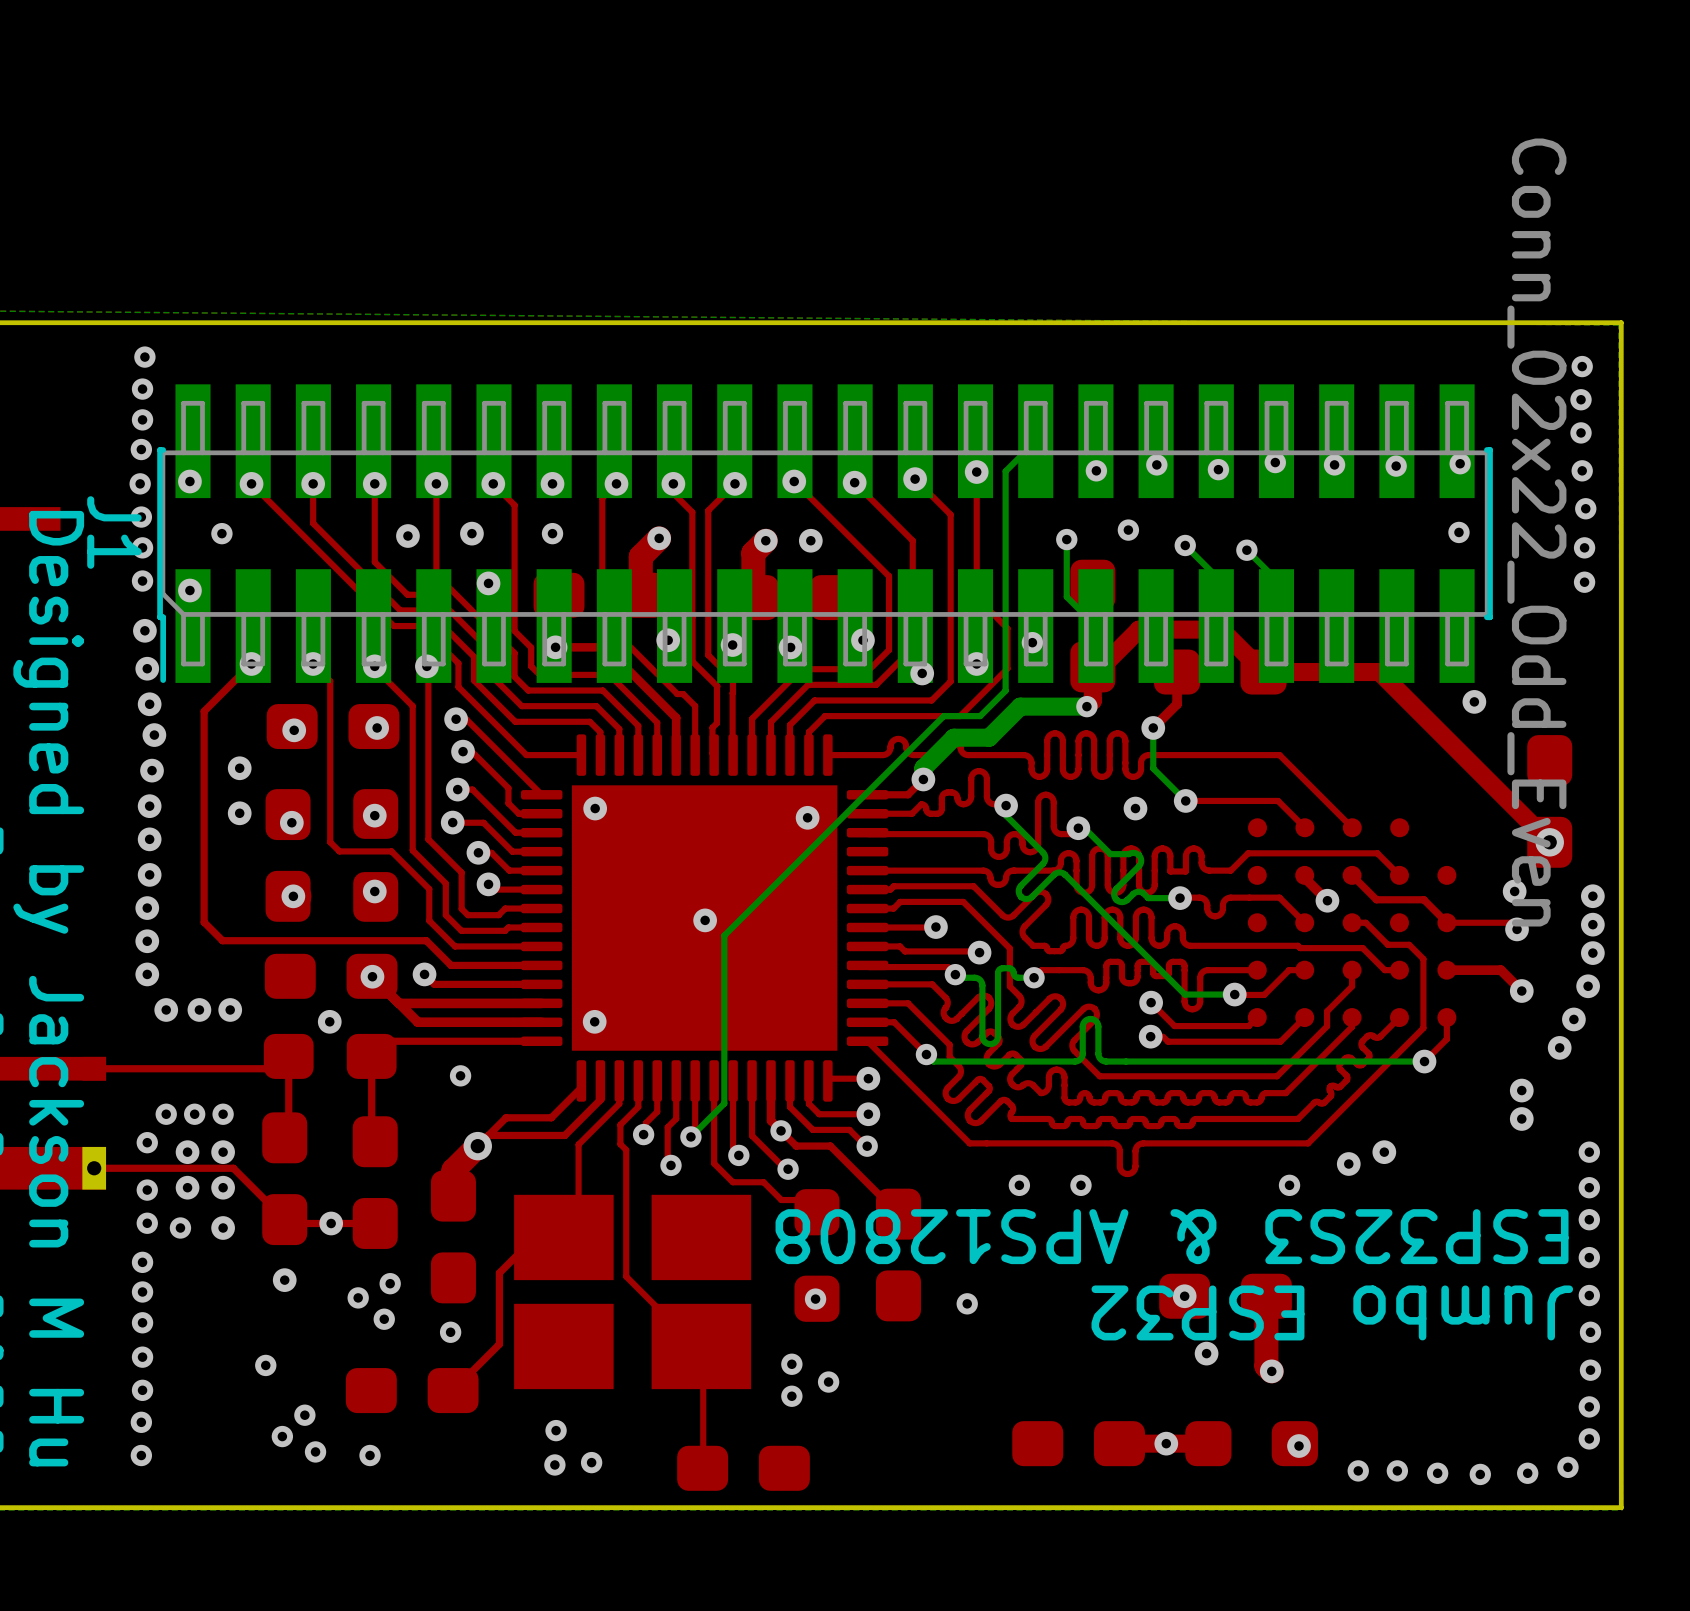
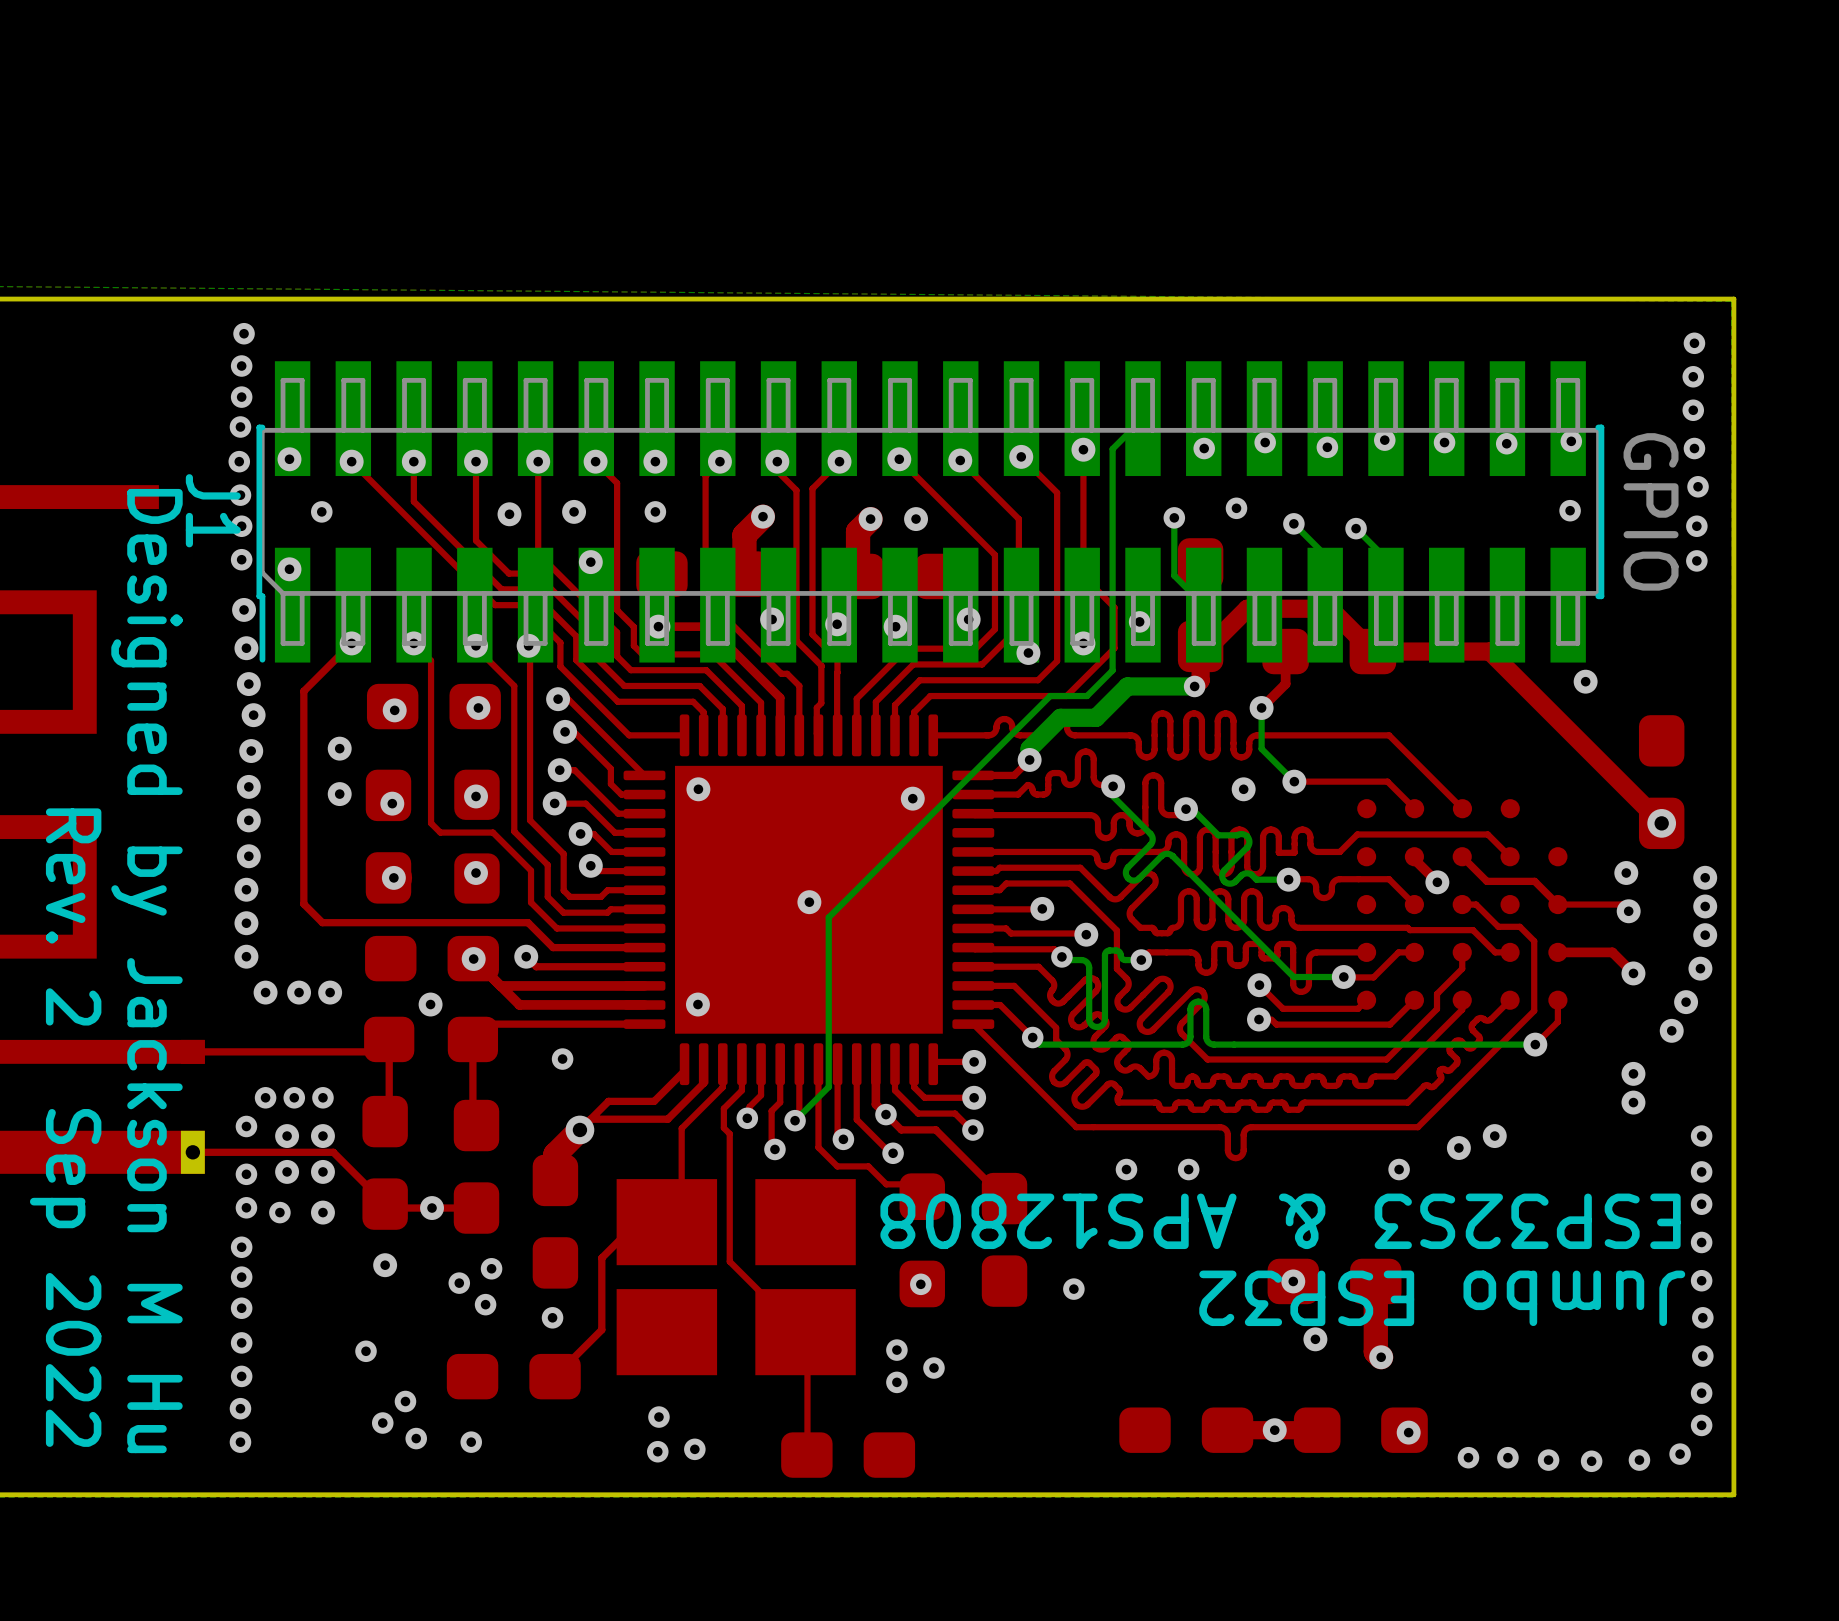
J1 value: Conn_02x22_Odd_Even (1536, 532) -> GPIO (1651, 511)

